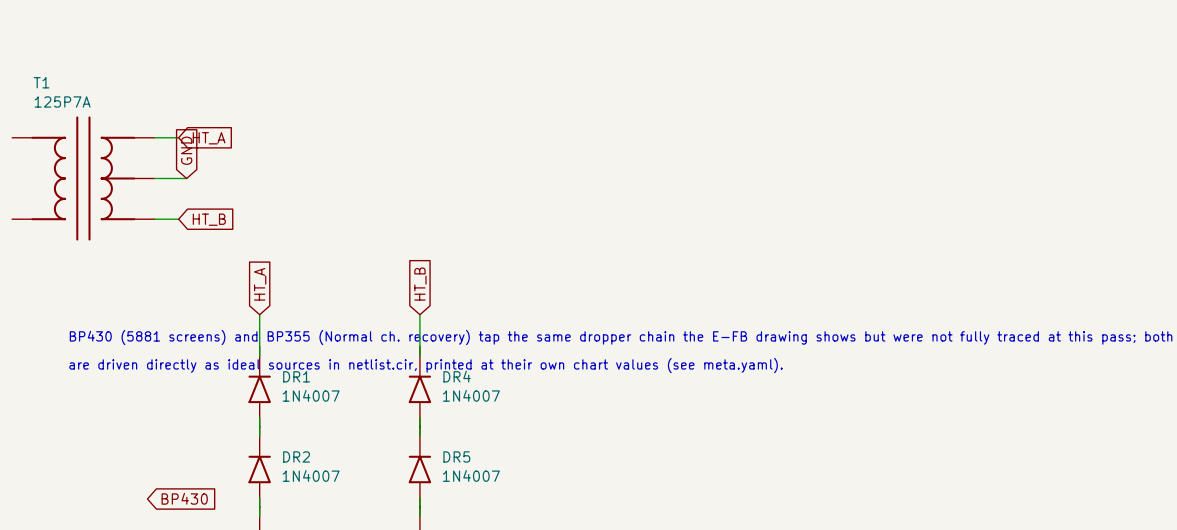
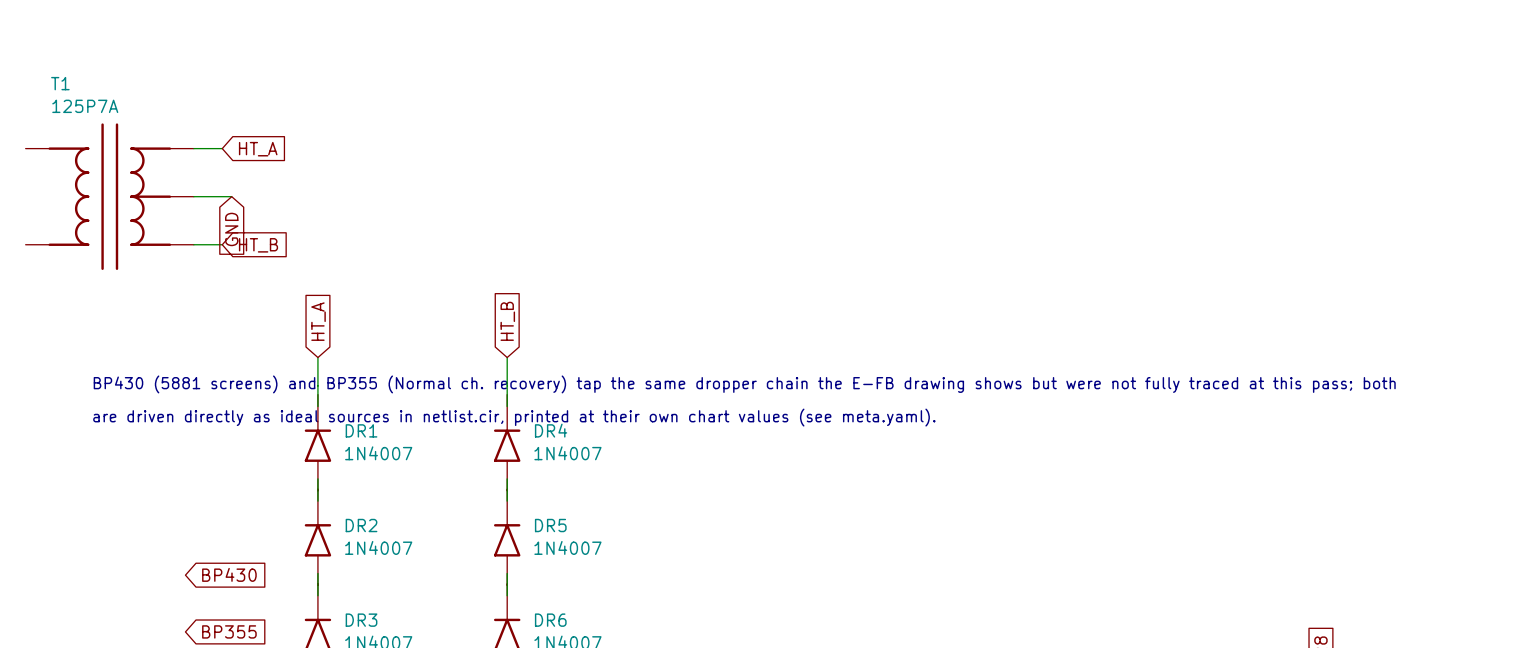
global label rotation: 0° (186, 150) -> 180° (231, 229)

